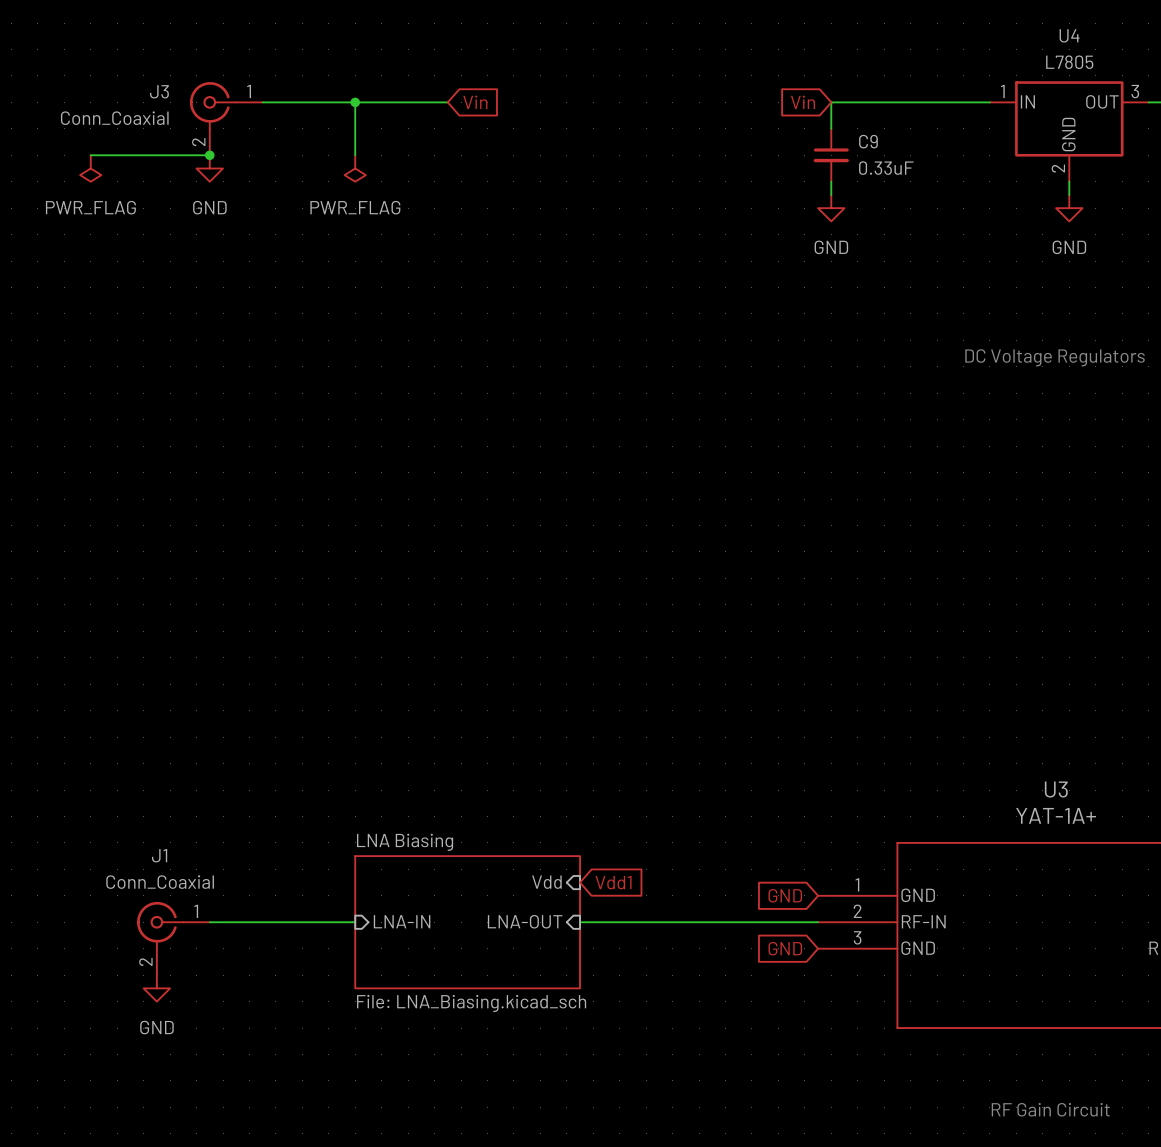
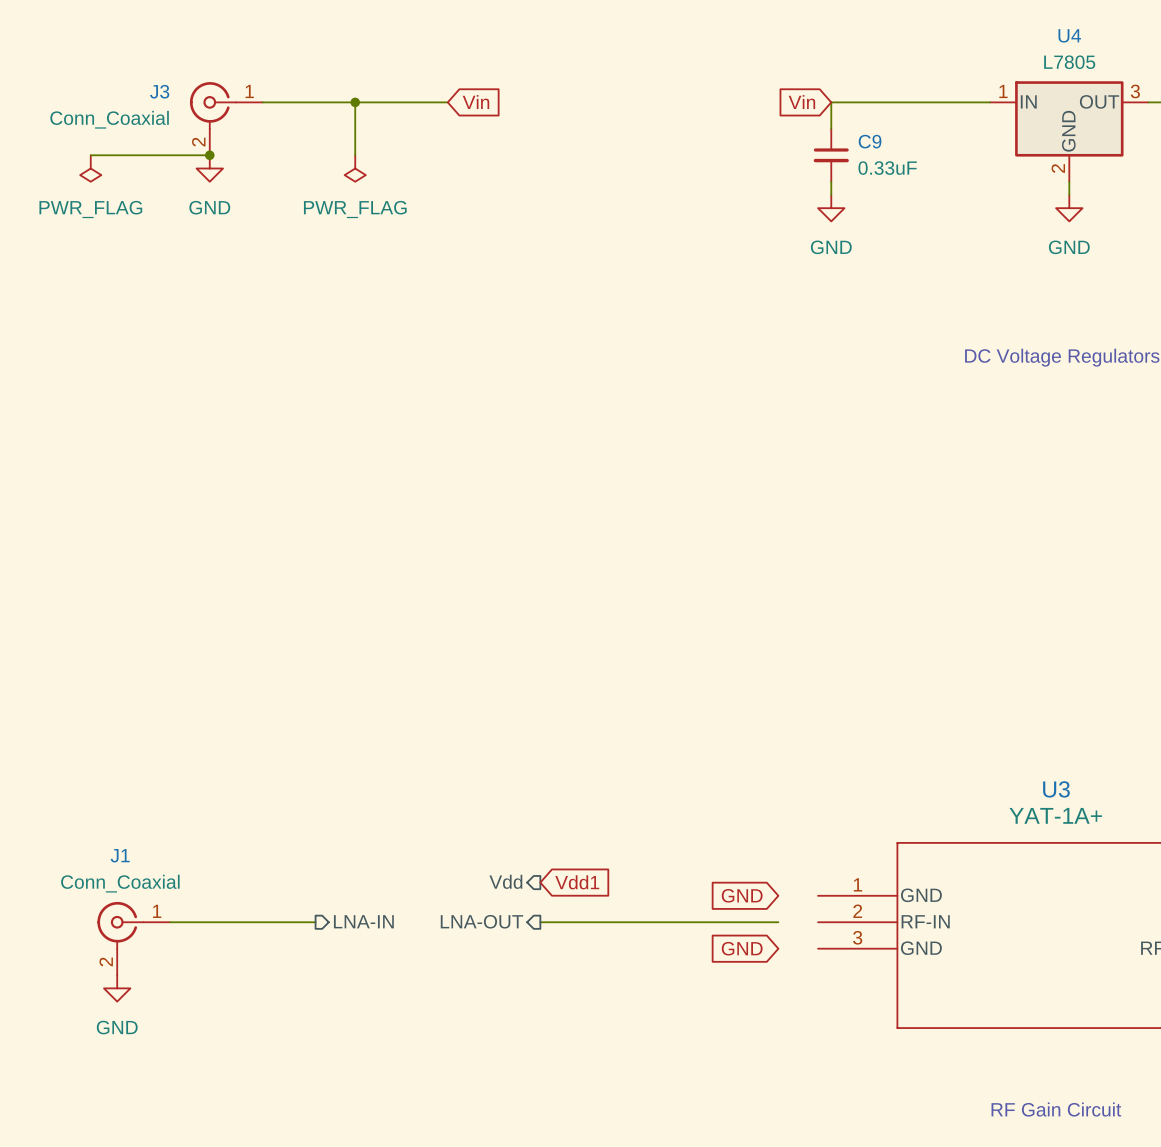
sheet pin position: Vdd (546, 882) -> Vdd (505, 881)
global label position: Vdd1 (613, 882) -> Vdd1 (577, 882)
global label position: GND (785, 895) -> GND (742, 895)
sheet pin position: LNA-IN (402, 921) -> LNA-IN (363, 921)
sheet pin position: LNA-OUT (525, 921) -> LNA-OUT (481, 921)
wire: (315, 922) (355, 922) -> (540, 922) (580, 922)
sheet LNA Biasing: File: LNA_Biasing.kicad_sch (467, 922) -> none
wire: (778, 922) (818, 922) -> none
J1 position: (173, 938) -> (133, 938)
global label position: GND (785, 948) -> GND (742, 948)
power symbol position: GND (156, 988) -> GND (117, 988)

